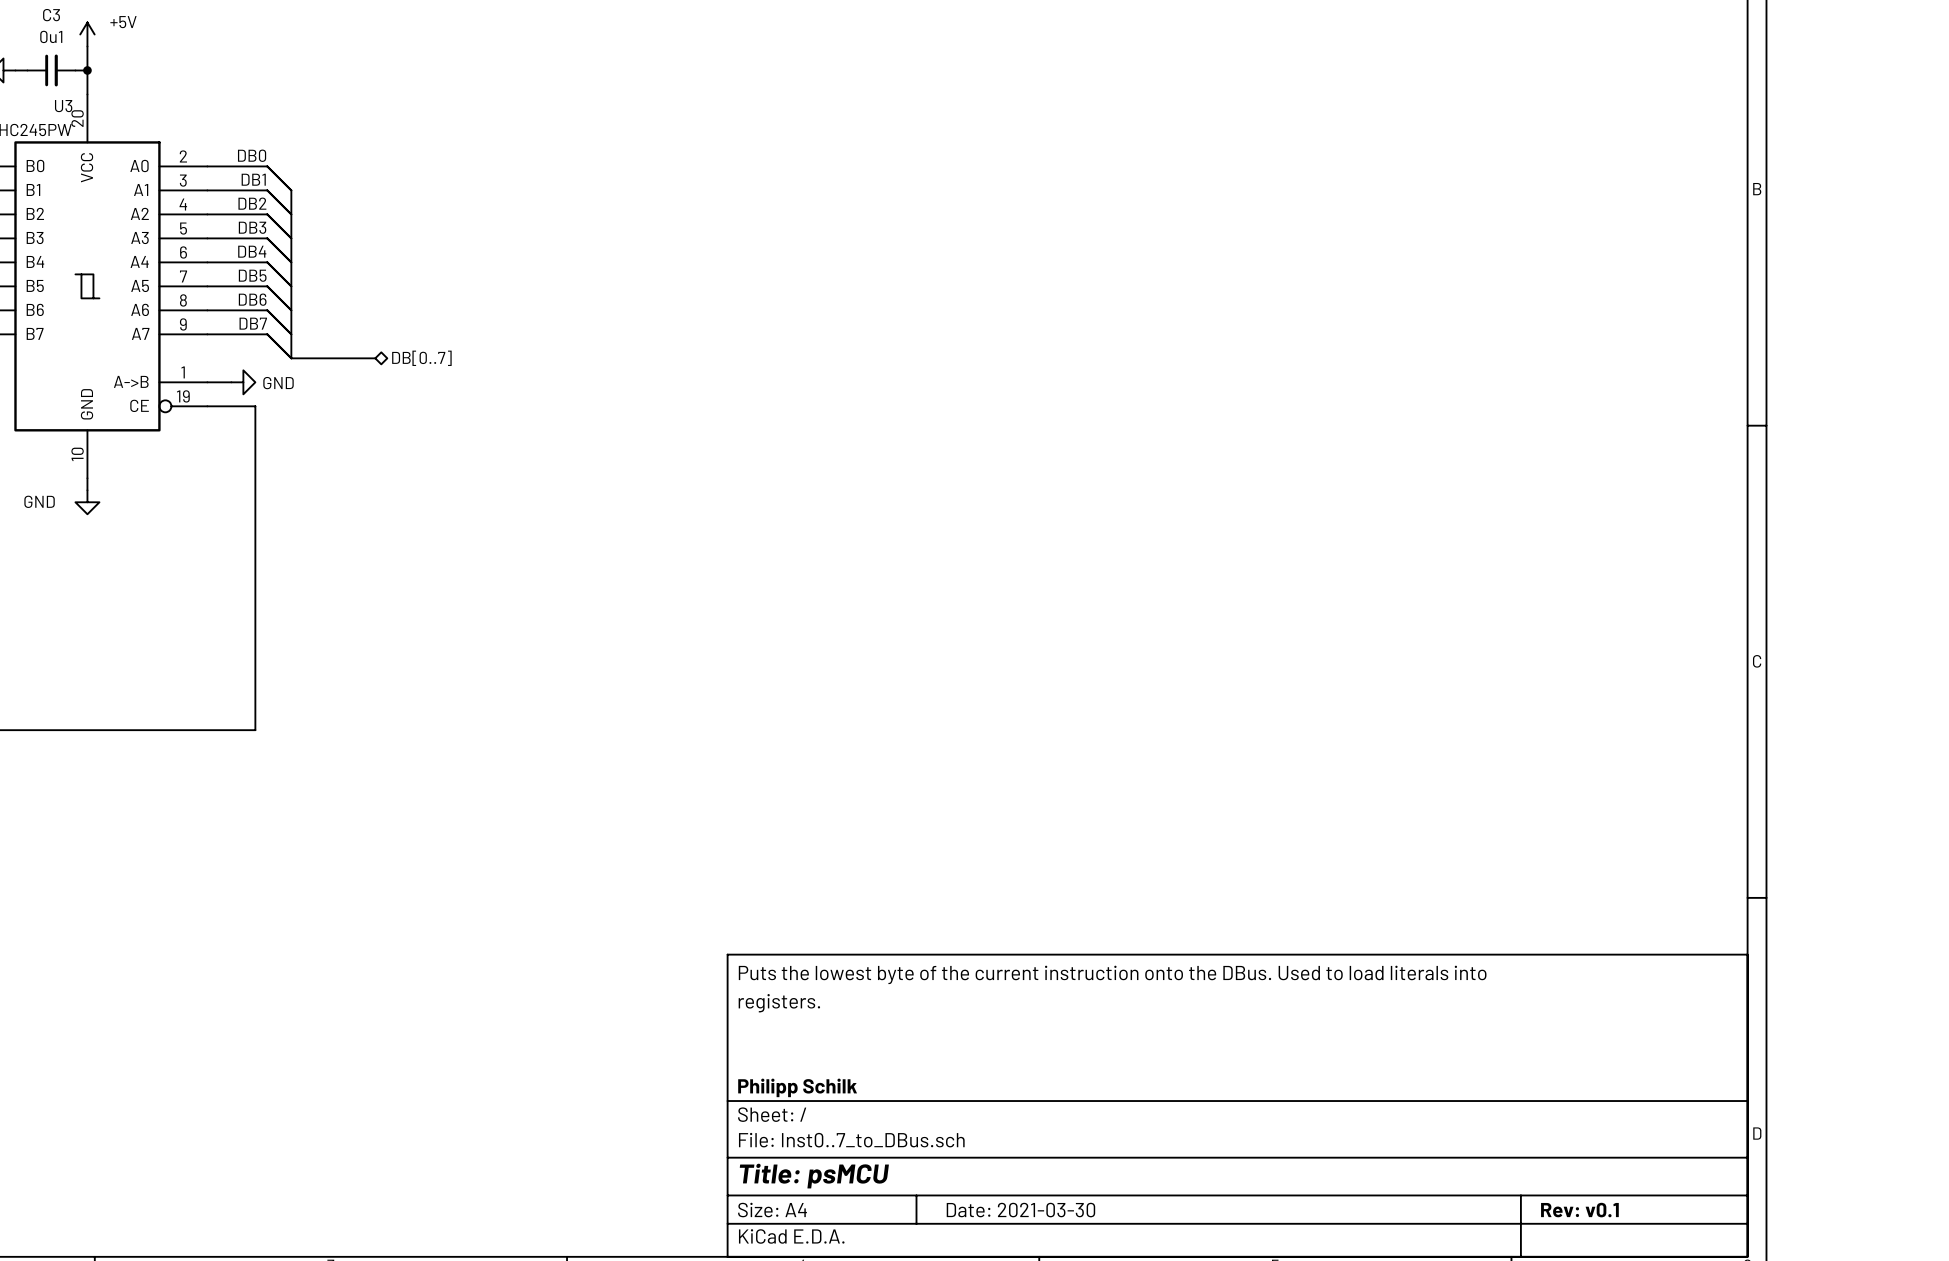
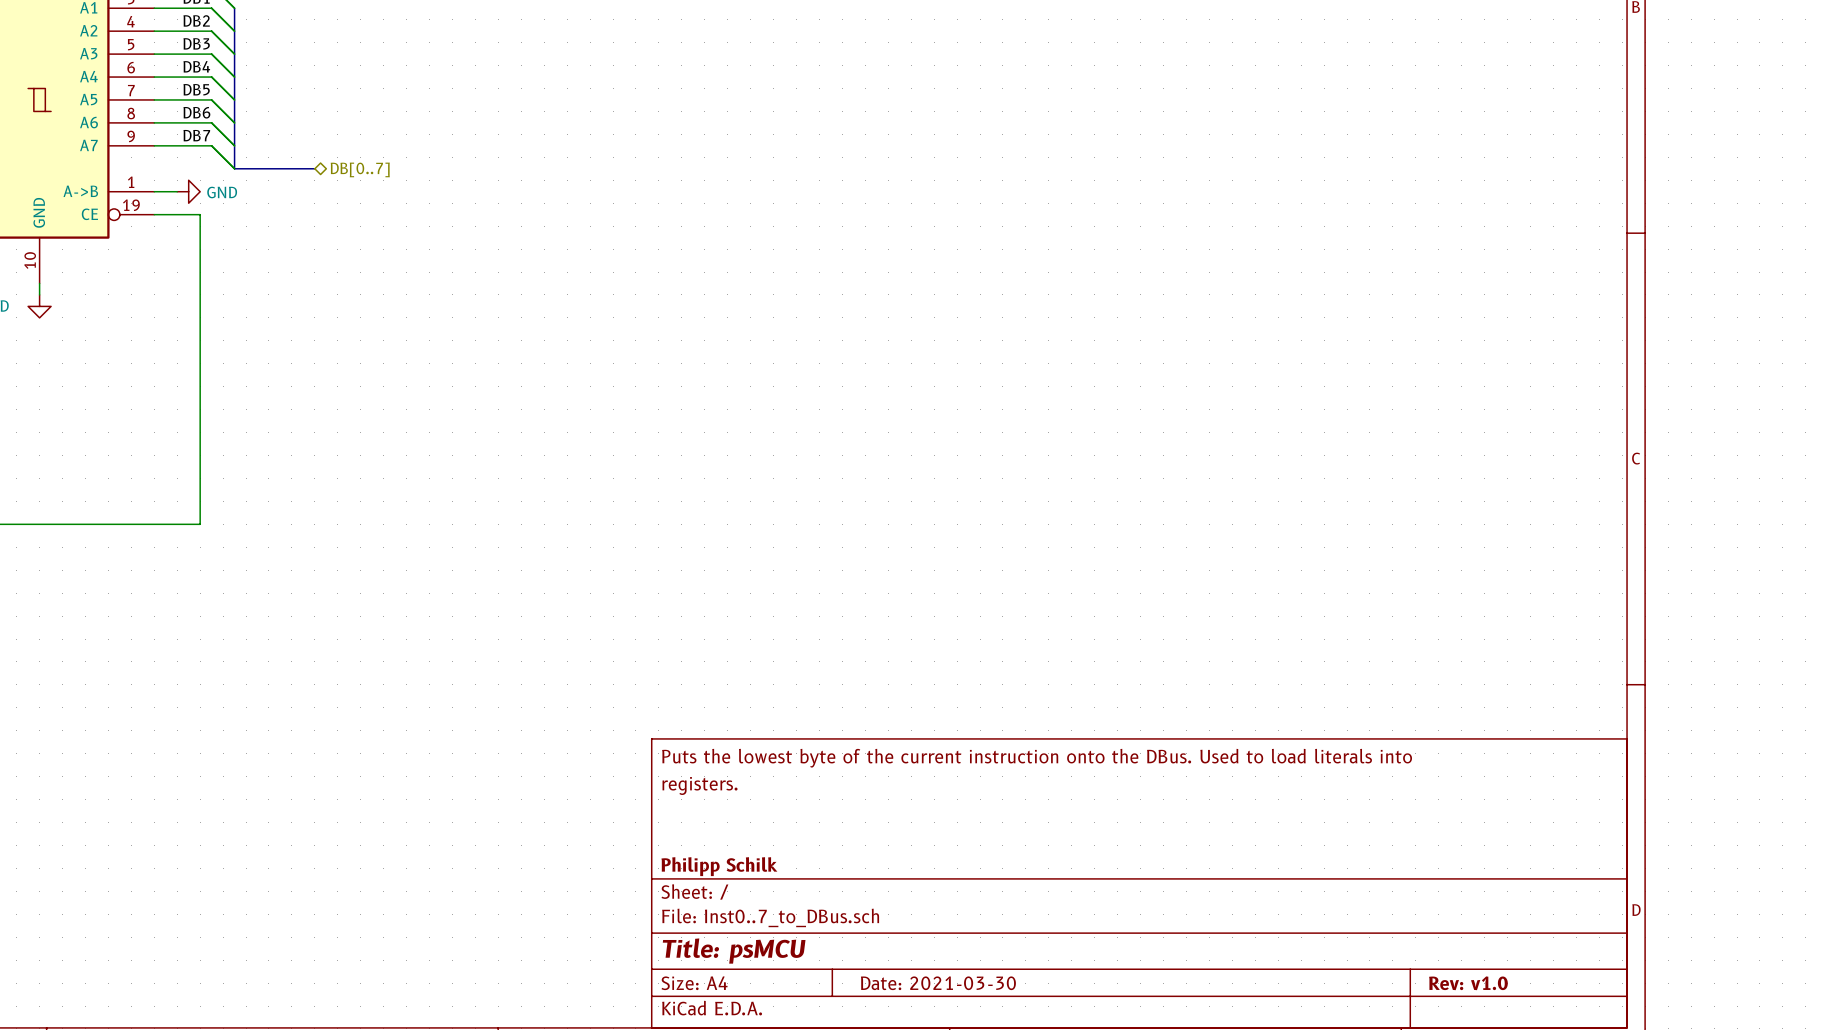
title block: Rev: v0.1 (1579, 1210) -> Rev: v1.0 (1468, 983)

